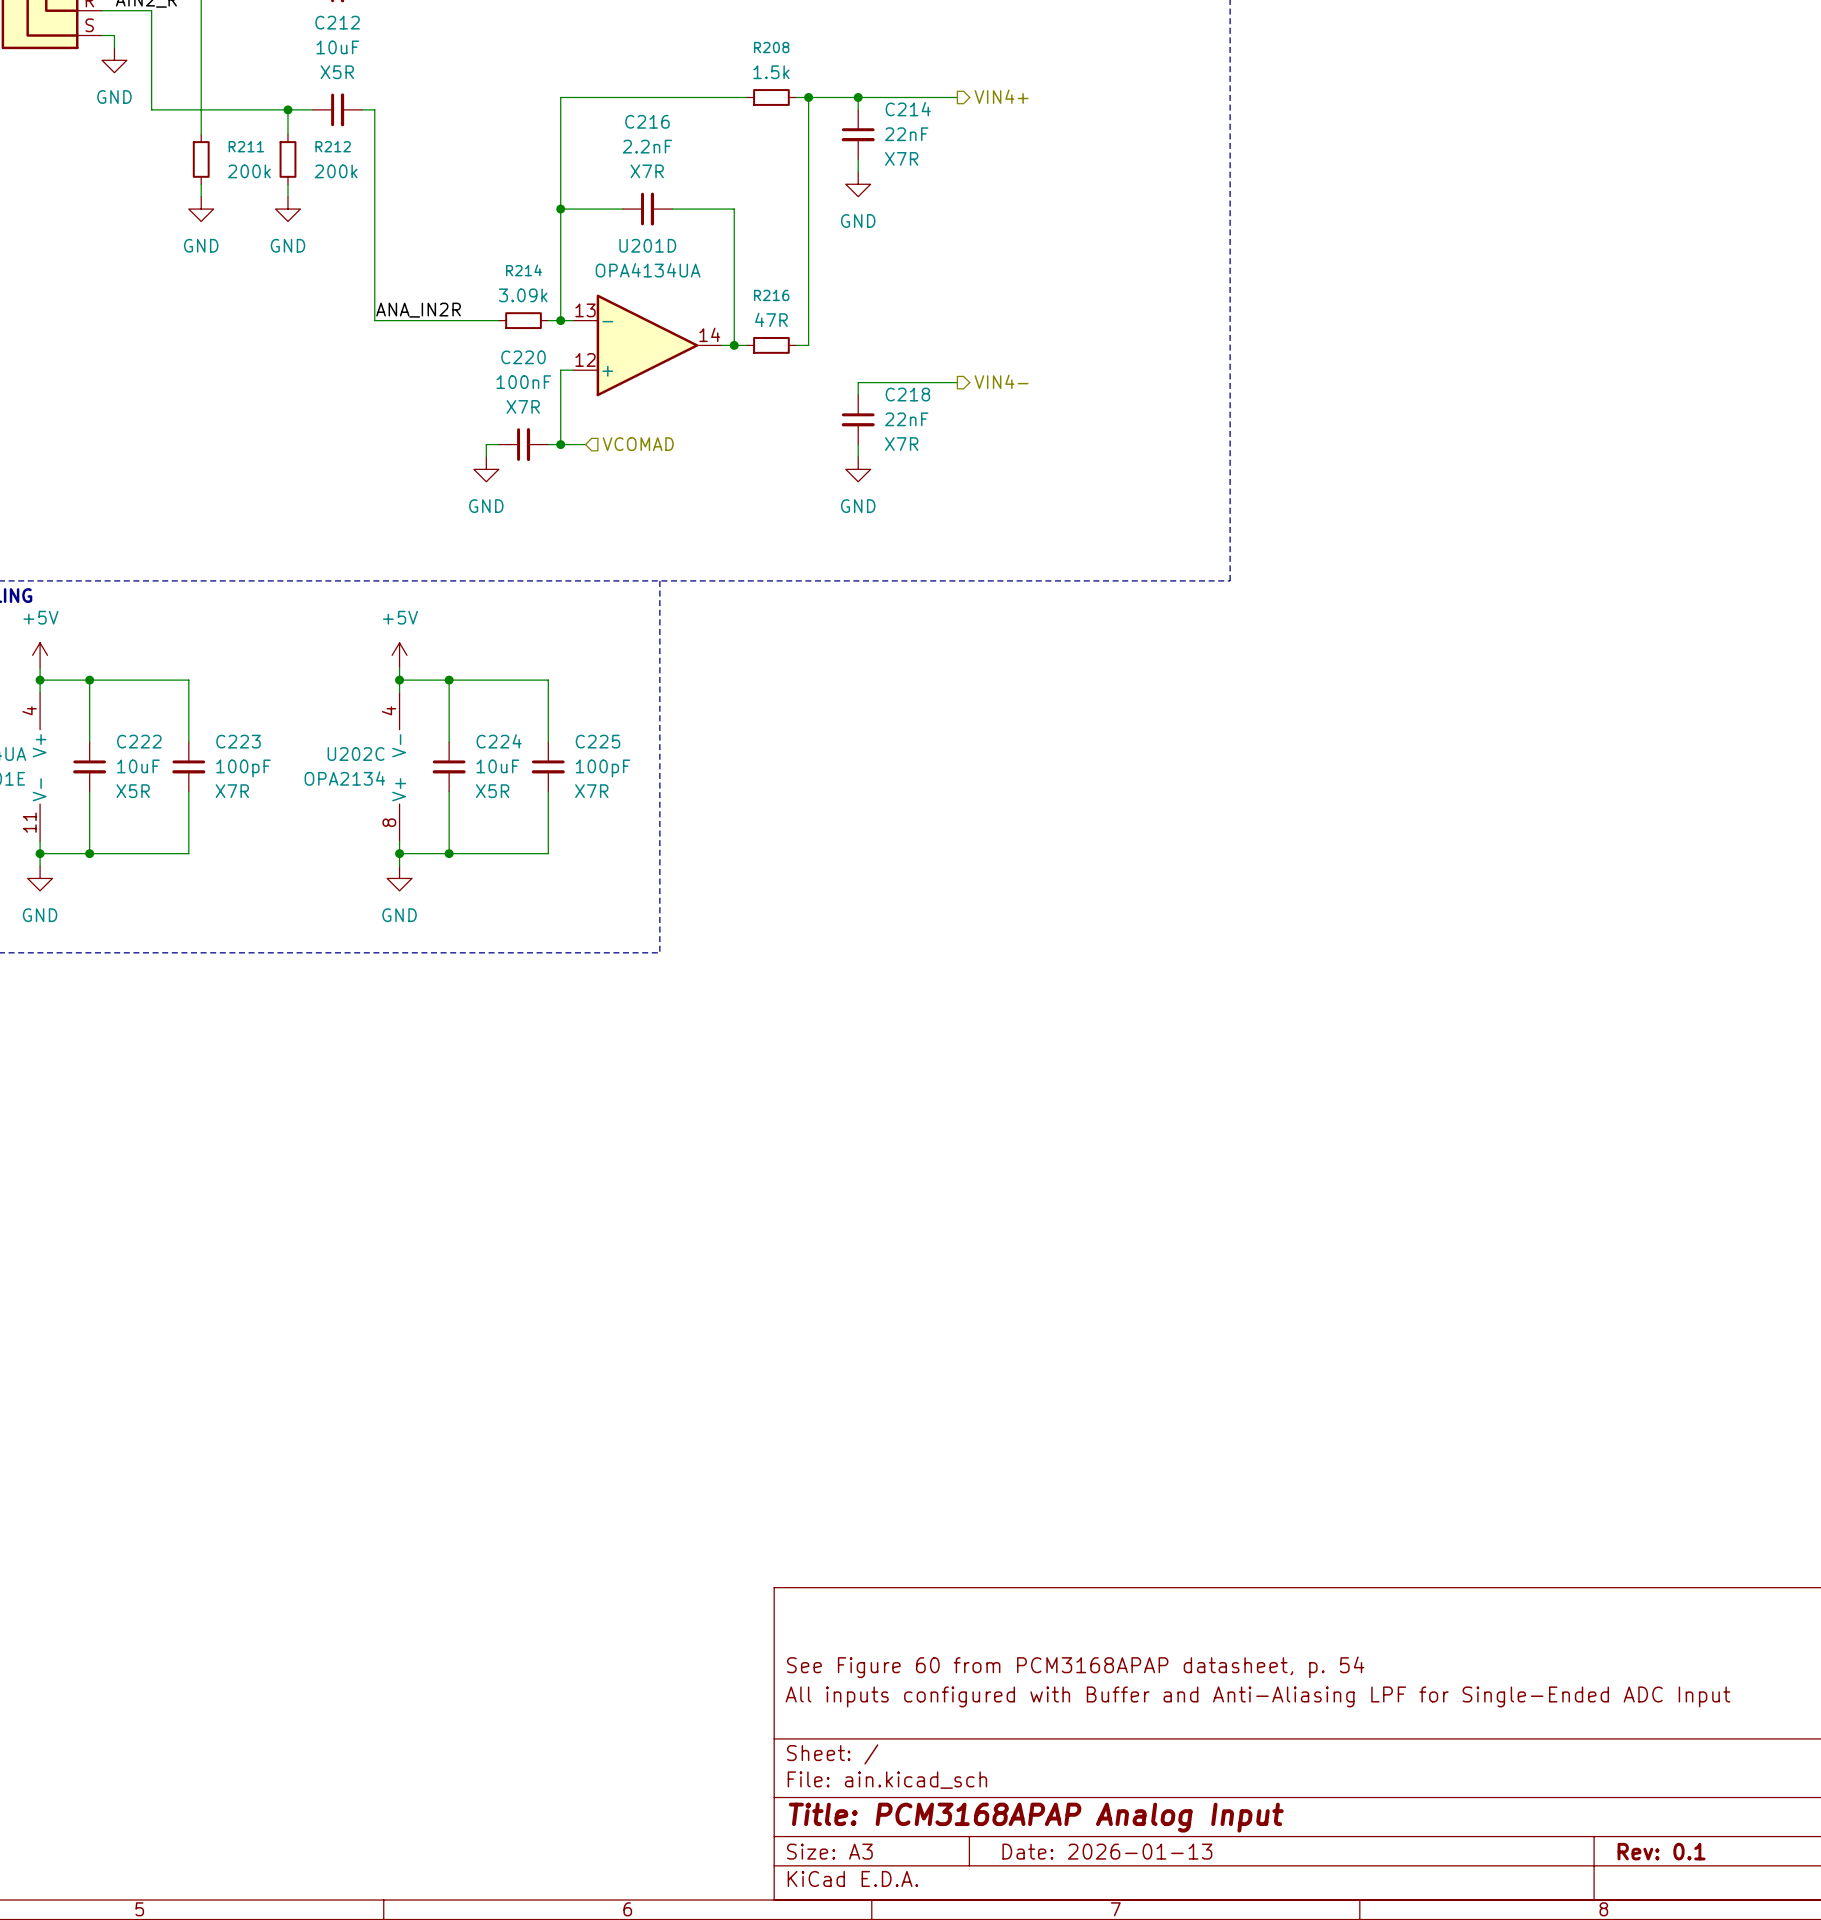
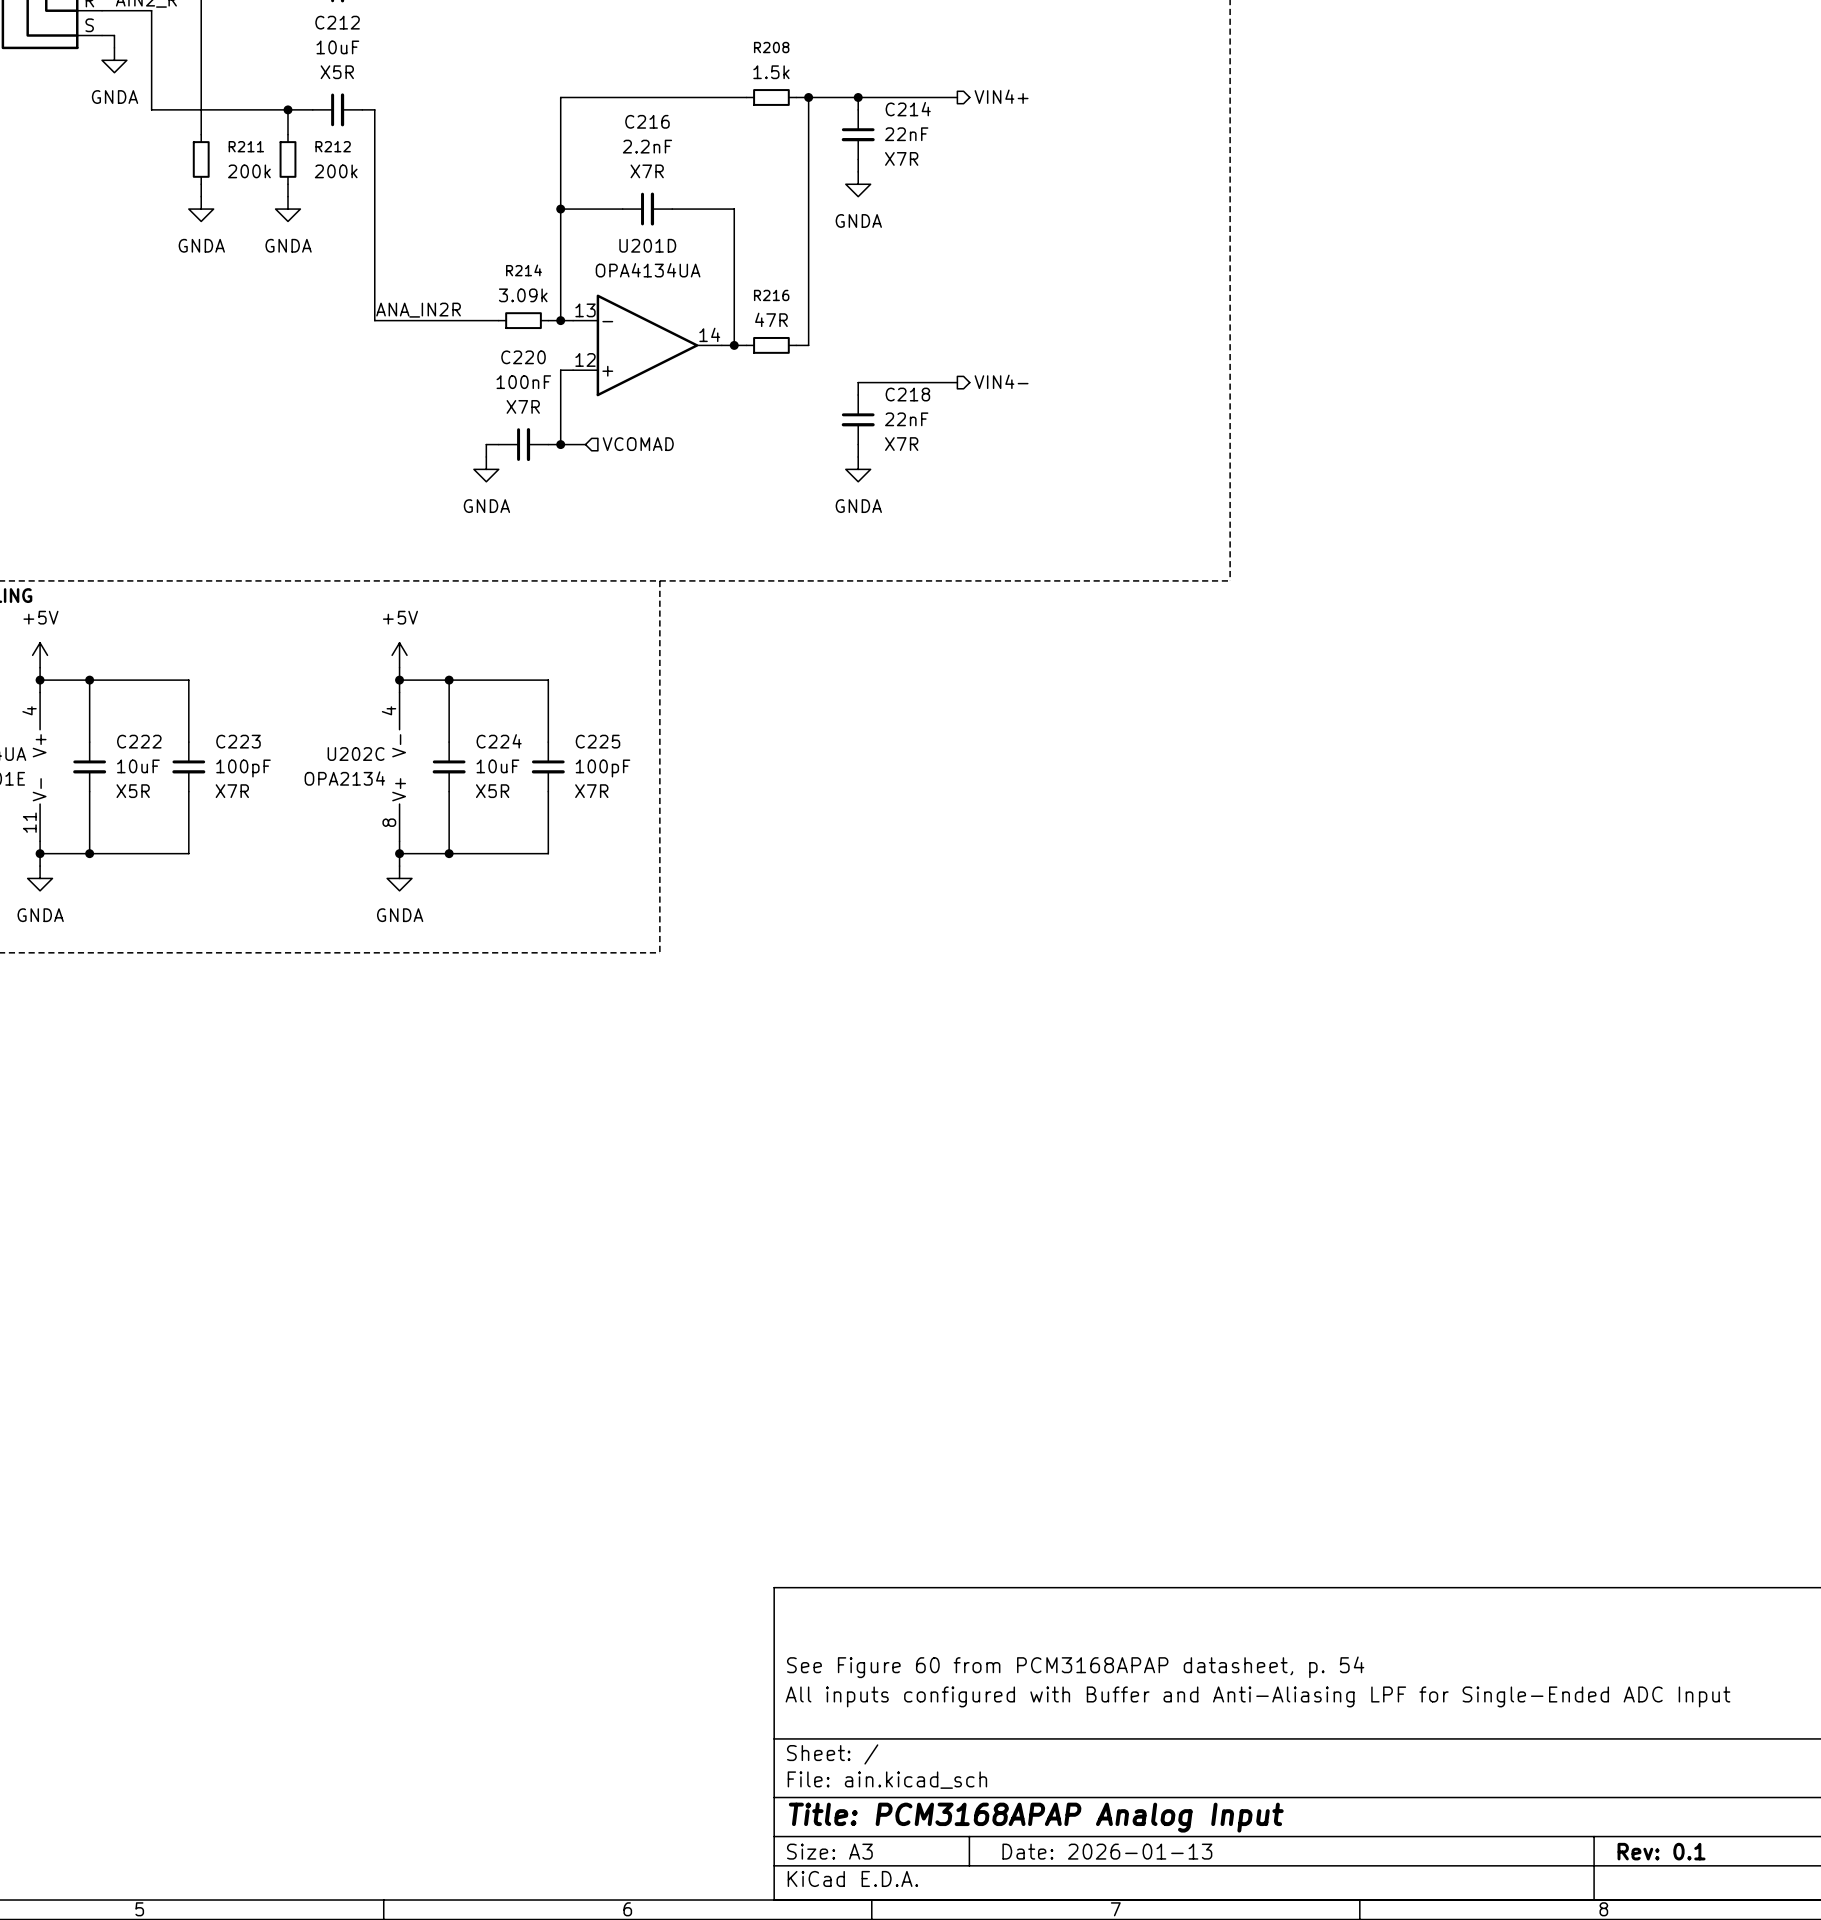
power symbol: GND (114, 60) -> GNDA (114, 60)
power symbol: GND (858, 184) -> GNDA (858, 184)
power symbol: GND (201, 209) -> GNDA (201, 209)
power symbol: GND (287, 209) -> GNDA (287, 209)
power symbol: GND (486, 469) -> GNDA (486, 469)
power symbol: GND (858, 469) -> GNDA (858, 469)
power symbol: GND (40, 878) -> GNDA (40, 878)
power symbol: GND (399, 878) -> GNDA (399, 878)

